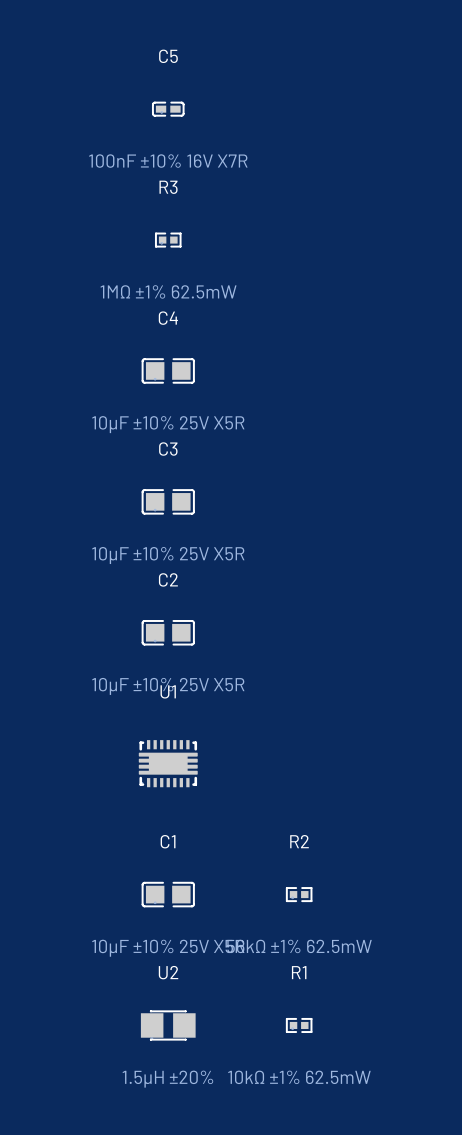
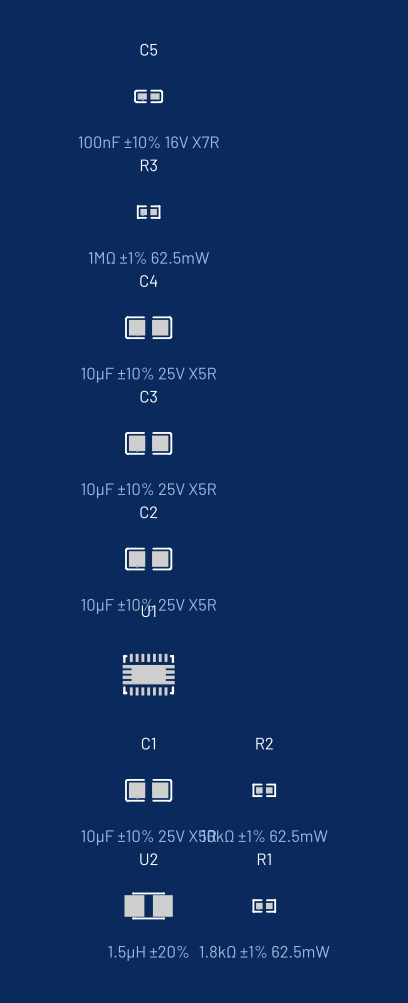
R2 value: 56kΩ ±1% 62.5mW (299, 946) -> 10kΩ ±1% 62.5mW (264, 836)
R1 value: 10kΩ ±1% 62.5mW (299, 1077) -> 1.8kΩ ±1% 62.5mW (264, 951)

